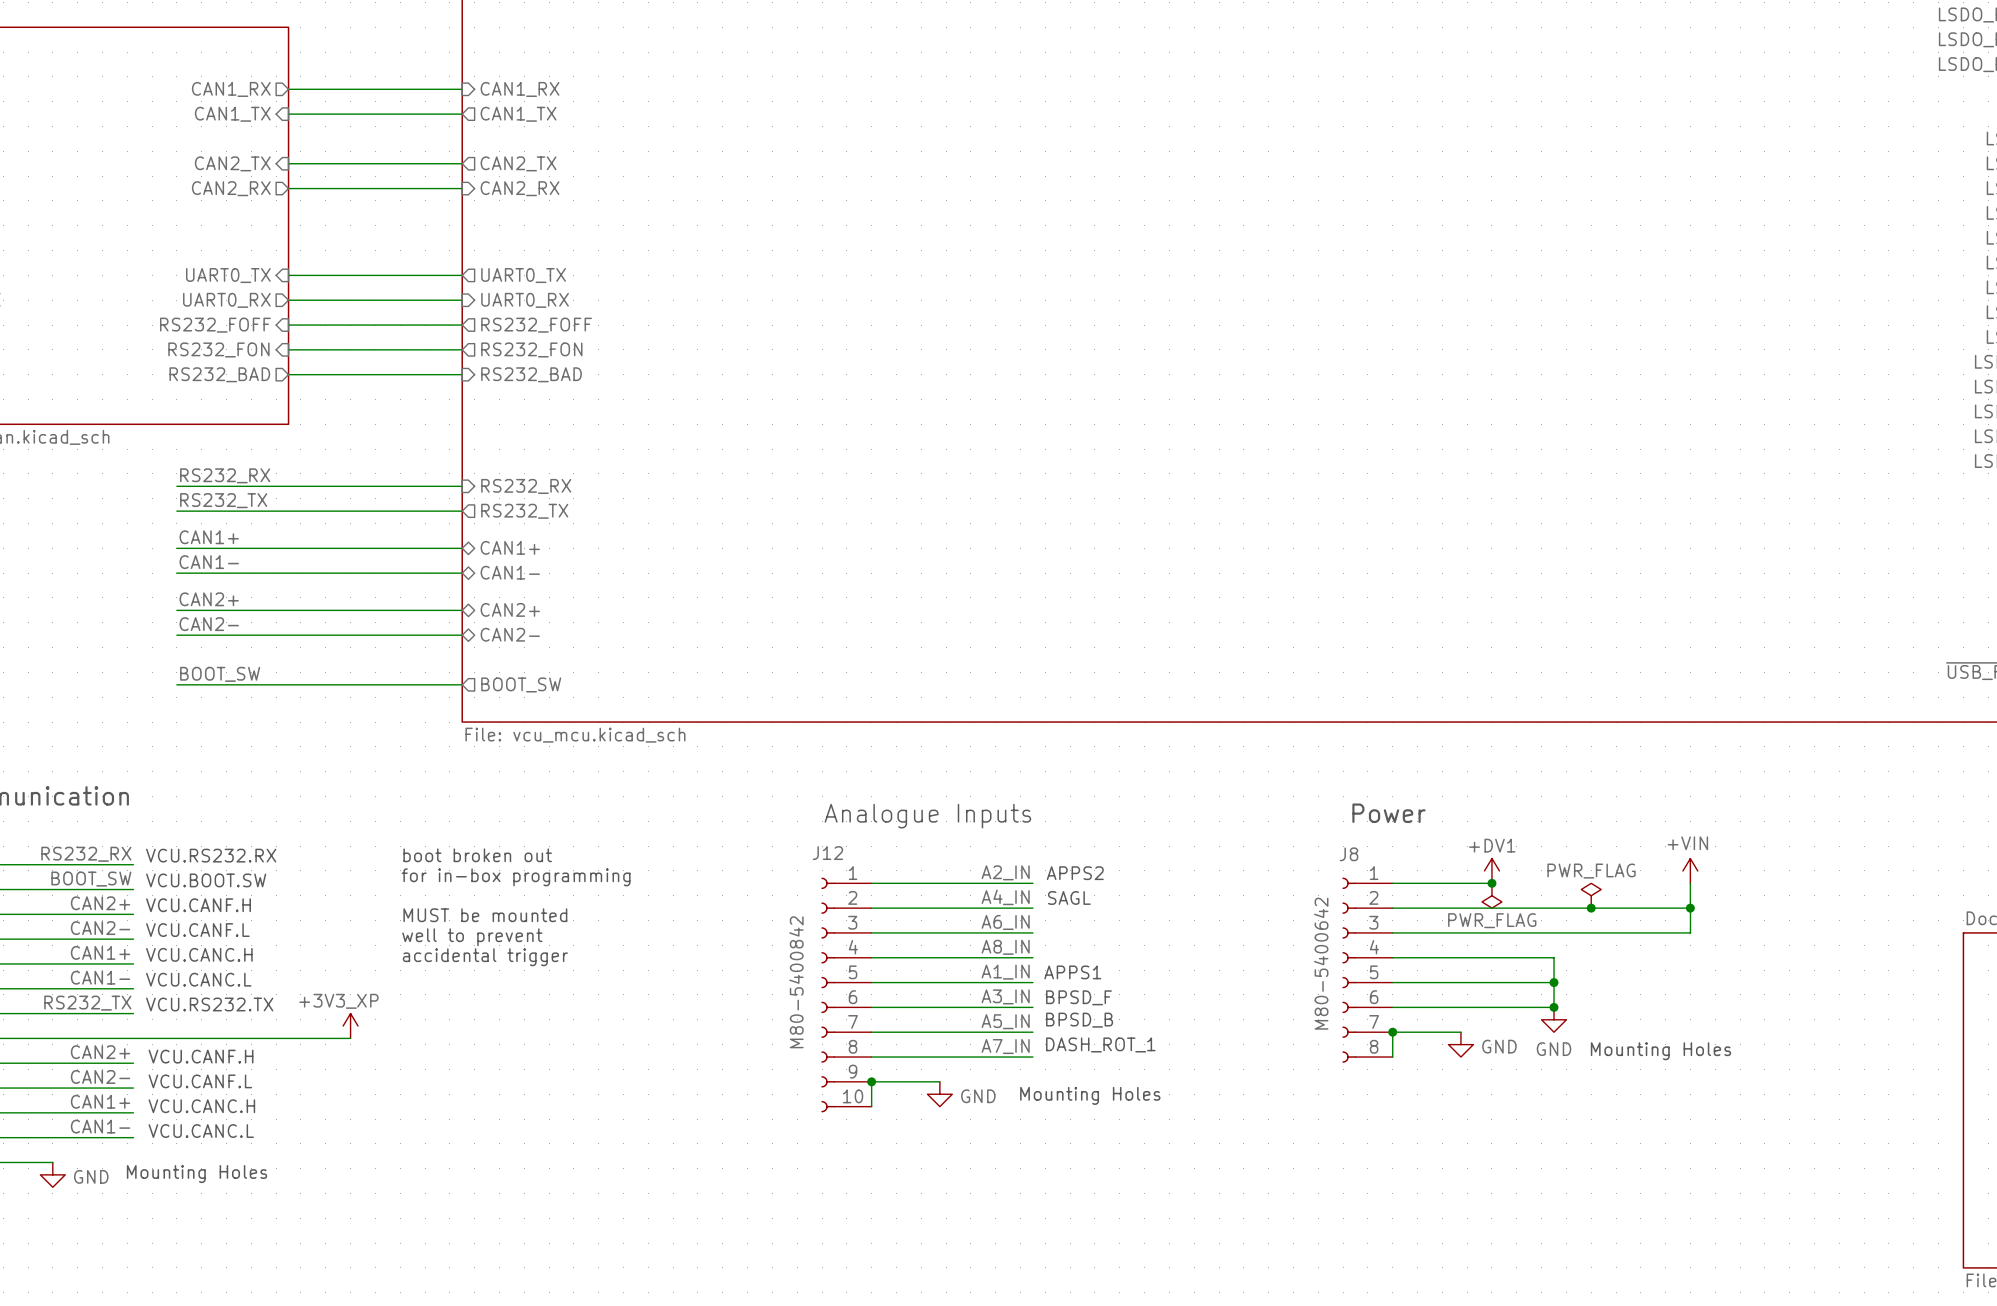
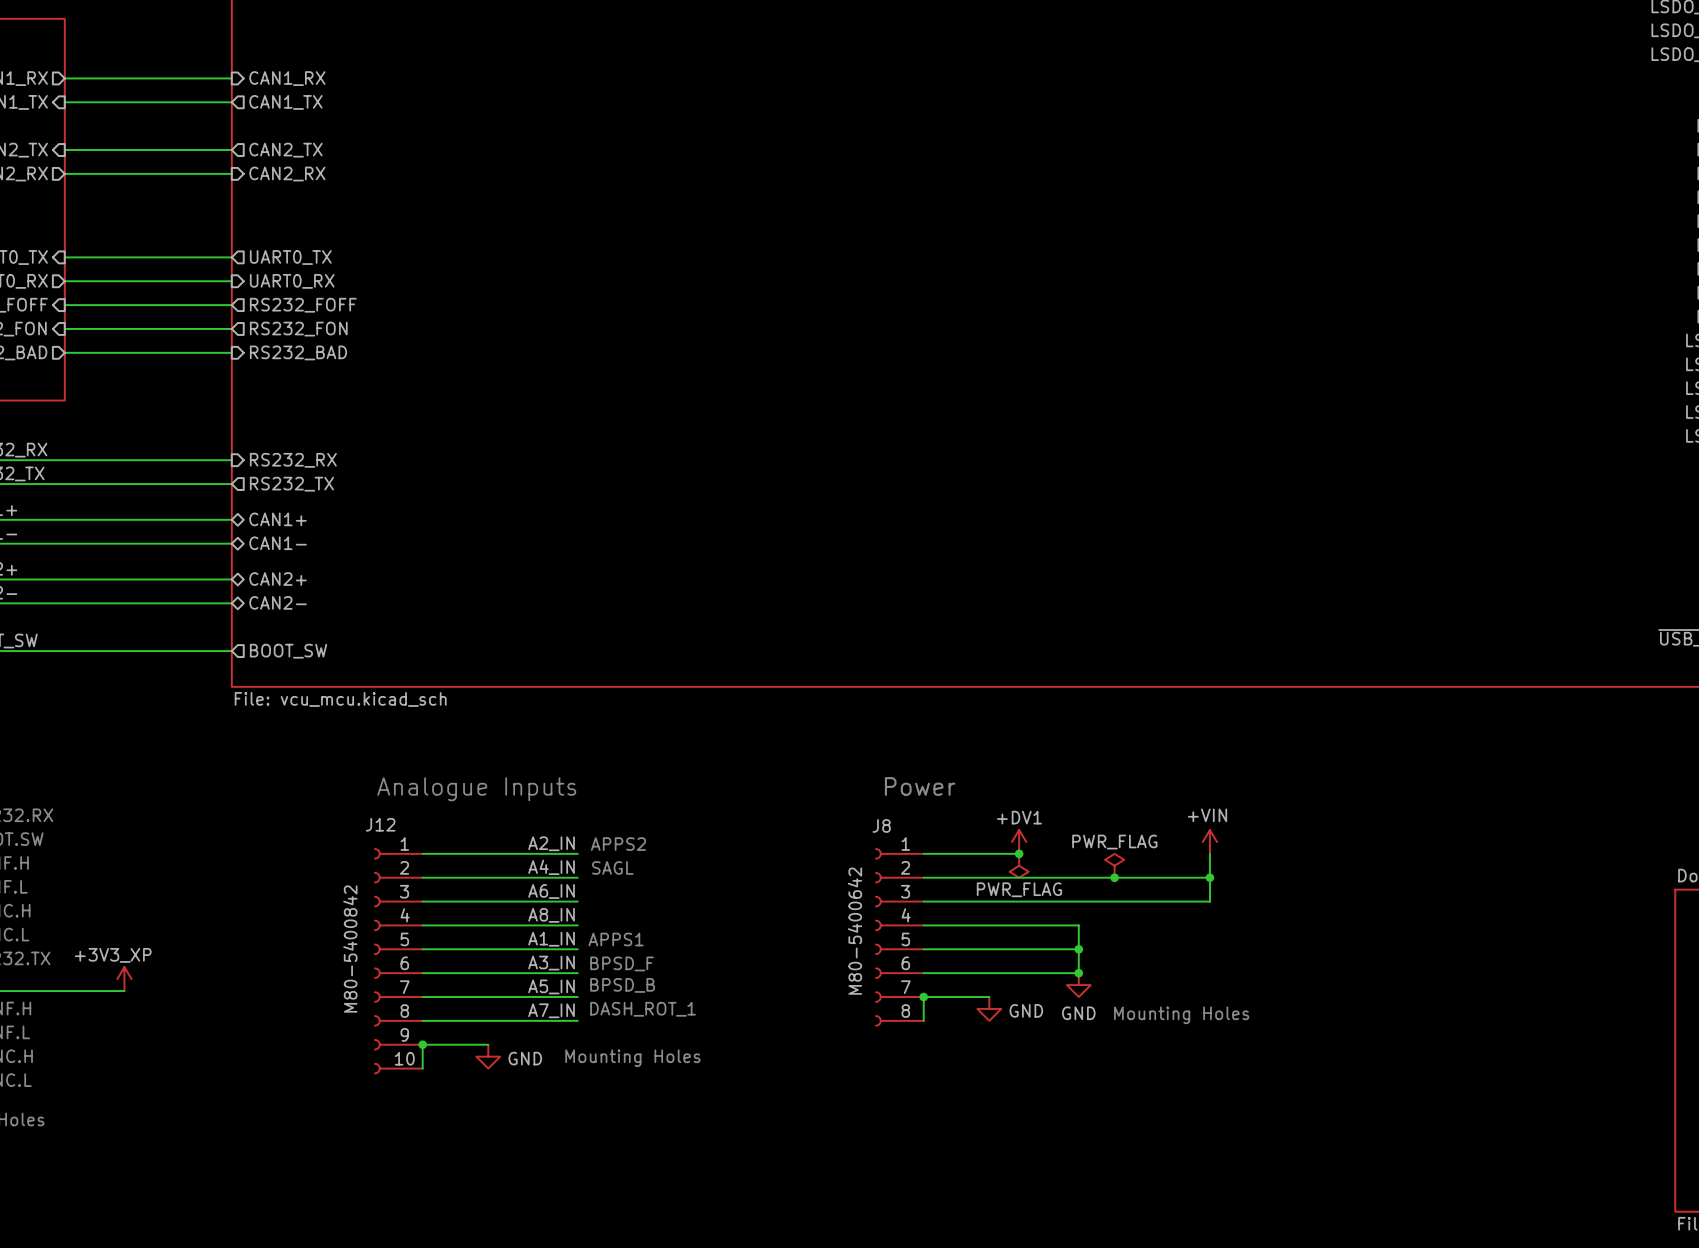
text position: Power (1388, 813) -> Power (920, 786)
text position: Analogue Inputs (927, 816) -> Analogue Inputs (476, 789)
text: boot broken out (477, 855) -> none
power symbol position: +DV1 (1491, 870) -> +DV1 (1019, 841)
power symbol position: +VIN (1690, 871) -> +VIN (1209, 842)
label position: A2_IN (1005, 872) -> A2_IN (551, 843)
text position: APPS2 (1075, 873) -> APPS2 (618, 844)
text: for in-box programming (516, 877) -> none
wire: (871, 883) (1032, 883) -> (422, 853) (577, 853)
wire: (1392, 883) (1491, 883) -> (923, 853) (1019, 853)
junction position: (1491, 883) -> (1209, 877)
wire: (1690, 883) (1690, 908) -> (1209, 853) (1209, 877)
junction: none -> (1019, 853)
power symbol: PWR_FLAG (1491, 895) -> none
power symbol: PWR_FLAG (1591, 895) -> none
label position: A4_IN (1005, 897) -> A4_IN (551, 867)
text position: SAGL (1069, 897) -> SAGL (612, 867)
wire: (871, 908) (1032, 908) -> (422, 877) (577, 877)
power symbol: none -> PWR_FLAG (1019, 865)
power symbol: none -> PWR_FLAG (1114, 865)
wire: (1392, 908) (1690, 908) (1690, 932) (1392, 932) -> (923, 877) (1210, 877) (1210, 901) (923, 901)
junction: (1591, 908) -> none
junction: (1690, 908) -> none
text: MUST be mounted (485, 915) -> none
junction: none -> (1114, 877)
label position: A6_IN (1005, 922) -> A6_IN (551, 891)
wire: (871, 932) (1032, 932) -> (422, 901) (577, 901)
text: well to prevent (472, 937) -> none
label position: A8_IN (1005, 947) -> A8_IN (551, 915)
text: accidental trigger (485, 957) -> none
wire: (871, 957) (1032, 957) -> (422, 925) (577, 925)
wire: (1392, 957) (1554, 957) (1554, 1007) (1392, 1007) -> (923, 925) (1078, 925) (1078, 973) (923, 973)
J8 position: (1367, 970) -> (899, 937)
label position: A1_IN (1005, 972) -> A1_IN (551, 939)
text position: APPS1 (1072, 972) -> APPS1 (616, 939)
wire: (871, 982) (1032, 982) -> (422, 949) (577, 949)
wire: (1392, 982) (1554, 982) -> (923, 949) (1078, 949)
junction: (1554, 982) -> none
J12 position: (846, 994) -> (398, 961)
junction: none -> (1078, 949)
label position: A3_IN (1005, 996) -> A3_IN (551, 963)
text position: BPSD_F (1078, 997) -> BPSD_F (622, 963)
wire: (871, 1007) (1032, 1007) -> (422, 973) (577, 973)
junction: (1554, 1007) -> none
junction: none -> (1078, 973)
power symbol: GND (1554, 1019) -> none
text position: BPSD_B (1079, 1020) -> BPSD_B (622, 985)
label position: A5_IN (1005, 1021) -> A5_IN (551, 986)
wire: (871, 1032) (1032, 1032) -> (422, 997) (577, 997)
power symbol: none -> GND (1078, 985)
junction: (1392, 1032) -> none
wire: (1460, 1032) (1392, 1032) (1392, 1057) -> (989, 997) (923, 997) (923, 1020)
text position: DASH_ROT_1 (1100, 1044) -> DASH_ROT_1 (643, 1009)
junction: none -> (923, 997)
power symbol: GND (1460, 1044) -> none
label position: A7_IN (1005, 1046) -> A7_IN (551, 1010)
text: Mounting Holes (1660, 1051) -> none
wire: (871, 1057) (1032, 1057) -> (422, 1020) (577, 1020)
power symbol: none -> GND (989, 1008)
text: none -> Mounting Holes (1181, 1015)
junction: (871, 1081) -> none
wire: (939, 1081) (871, 1081) (871, 1106) -> (488, 1044) (422, 1044) (422, 1068)
junction: none -> (422, 1044)
power symbol: GND (939, 1094) -> none
text: Mounting Holes (1090, 1095) -> none
power symbol: none -> GND (488, 1056)
text: none -> Mounting Holes (632, 1058)

